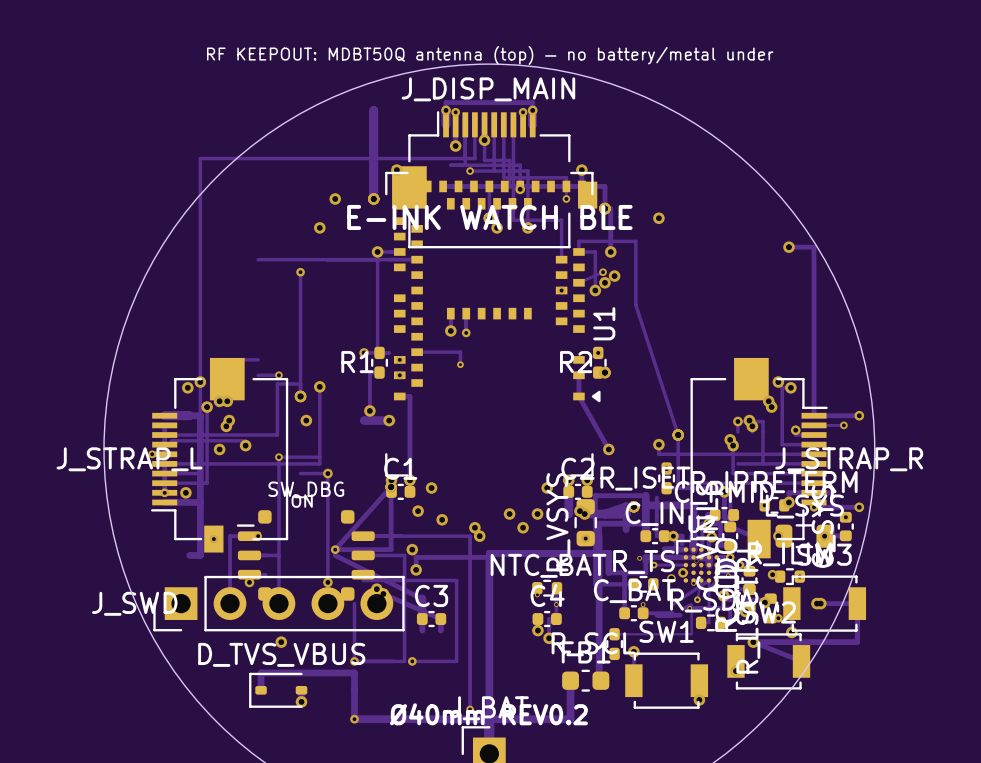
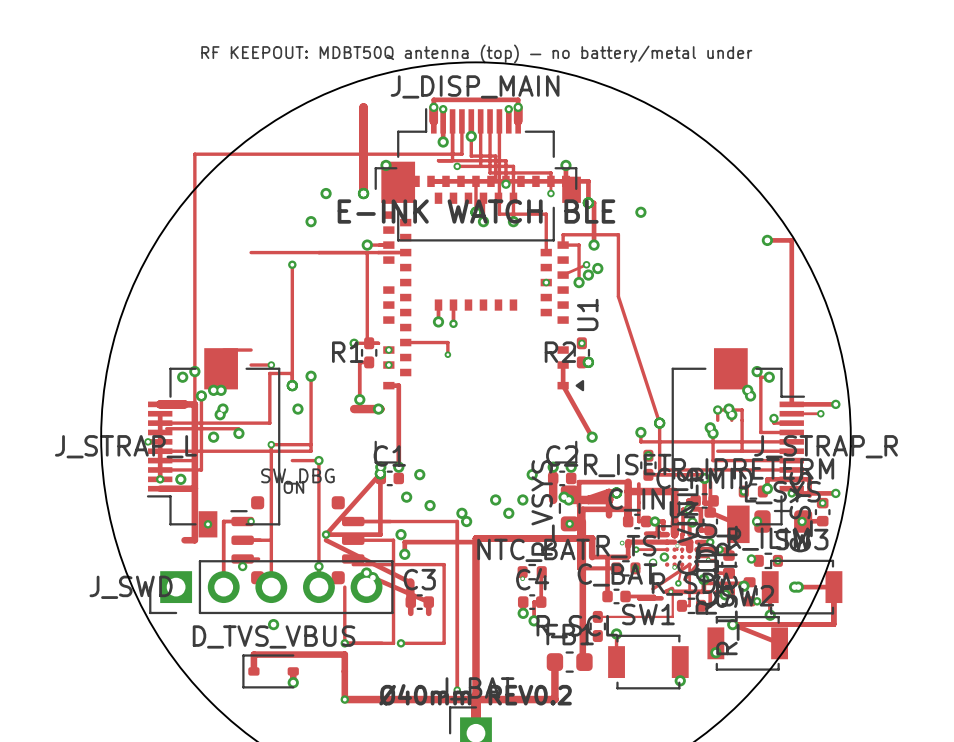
via: (556, 604) -> none
via: (643, 604) -> none

